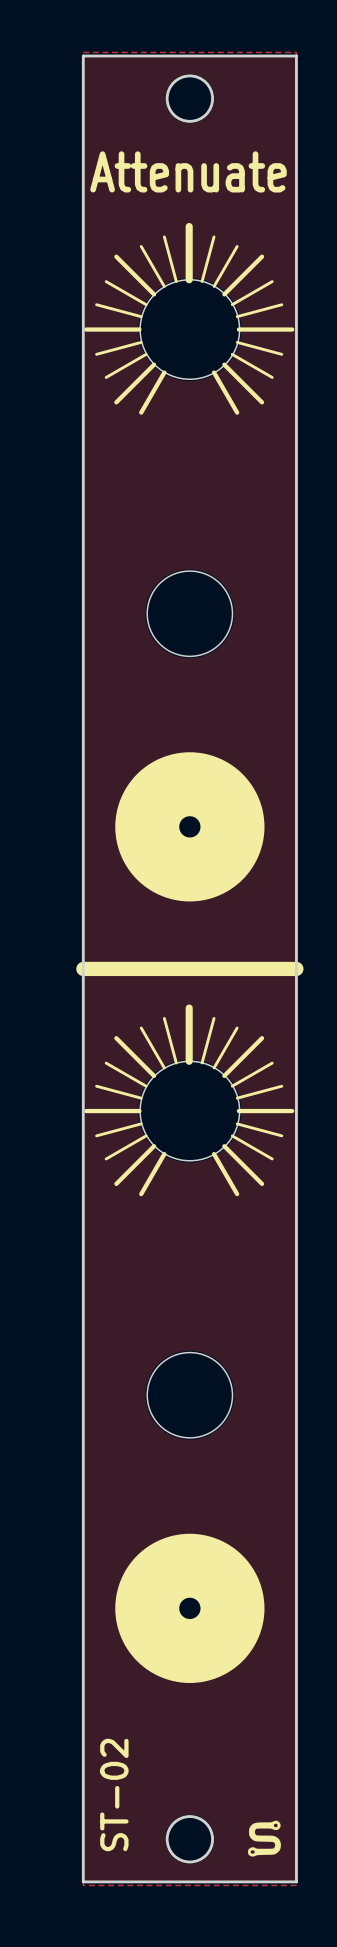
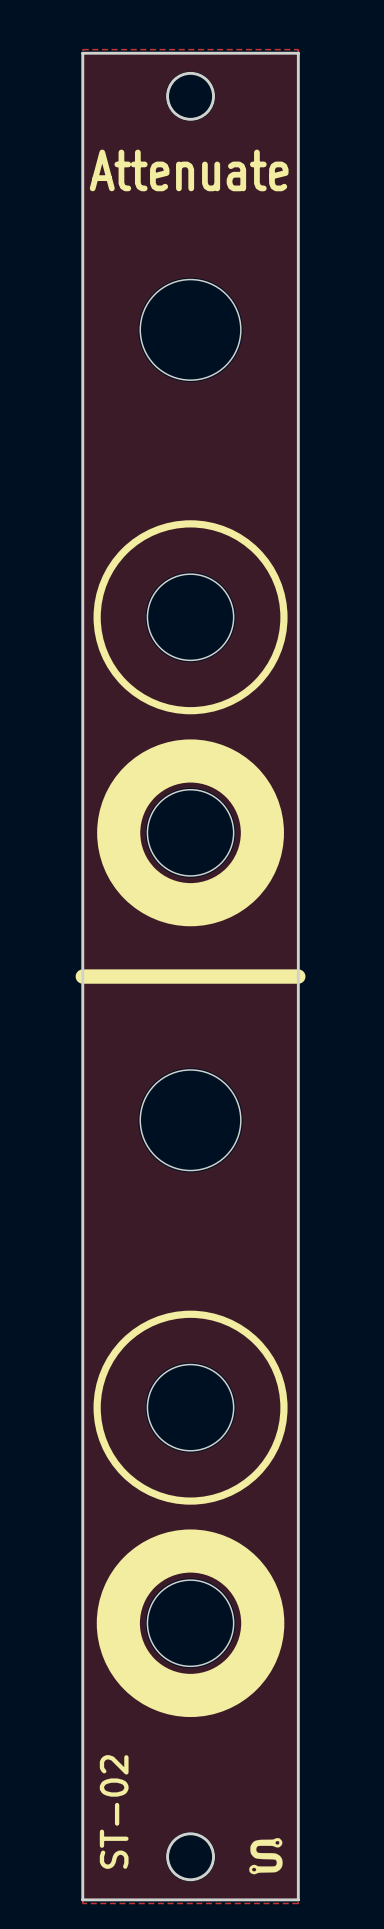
line: (189, 226) (189, 279) -> none
line: (164, 236) (176, 281) -> none
line: (214, 236) (202, 281) -> none
line: (141, 246) (164, 286) -> none
line: (237, 246) (214, 286) -> none
line: (116, 256) (154, 294) -> none
line: (262, 256) (224, 294) -> none
line: (106, 281) (146, 304) -> none
line: (272, 281) (232, 304) -> none
line: (96, 304) (141, 316) -> none
line: (281, 304) (237, 316) -> none
line: (86, 329) (139, 329) -> none
line: (238, 329) (292, 329) -> none
line: (141, 342) (96, 354) -> none
line: (237, 342) (281, 354) -> none
line: (146, 354) (106, 377) -> none
line: (232, 354) (272, 377) -> none
line: (154, 364) (116, 402) -> none
line: (224, 364) (262, 402) -> none
line: (164, 372) (141, 412) -> none
line: (214, 372) (237, 412) -> none
drawing: none -> [93, 520, 288, 715]
drawing shape: [115, 752, 265, 902] -> [97, 739, 284, 927]
line: (189, 1008) (189, 1061) -> none
line: (164, 1018) (176, 1063) -> none
line: (214, 1018) (202, 1063) -> none
line: (141, 1027) (164, 1067) -> none
line: (237, 1027) (214, 1067) -> none
line: (116, 1038) (154, 1075) -> none
line: (262, 1038) (224, 1075) -> none
line: (106, 1063) (146, 1086) -> none
line: (272, 1063) (232, 1086) -> none
line: (96, 1086) (141, 1098) -> none
line: (281, 1086) (237, 1098) -> none
line: (86, 1111) (139, 1111) -> none
line: (238, 1111) (292, 1111) -> none
line: (141, 1123) (96, 1135) -> none
line: (237, 1123) (281, 1135) -> none
line: (146, 1135) (106, 1159) -> none
line: (232, 1135) (272, 1159) -> none
line: (154, 1146) (116, 1183) -> none
line: (224, 1146) (262, 1183) -> none
line: (164, 1154) (141, 1194) -> none
line: (214, 1154) (237, 1194) -> none
drawing: none -> [93, 1310, 288, 1505]
drawing shape: [115, 1533, 265, 1683] -> [96, 1529, 285, 1718]

